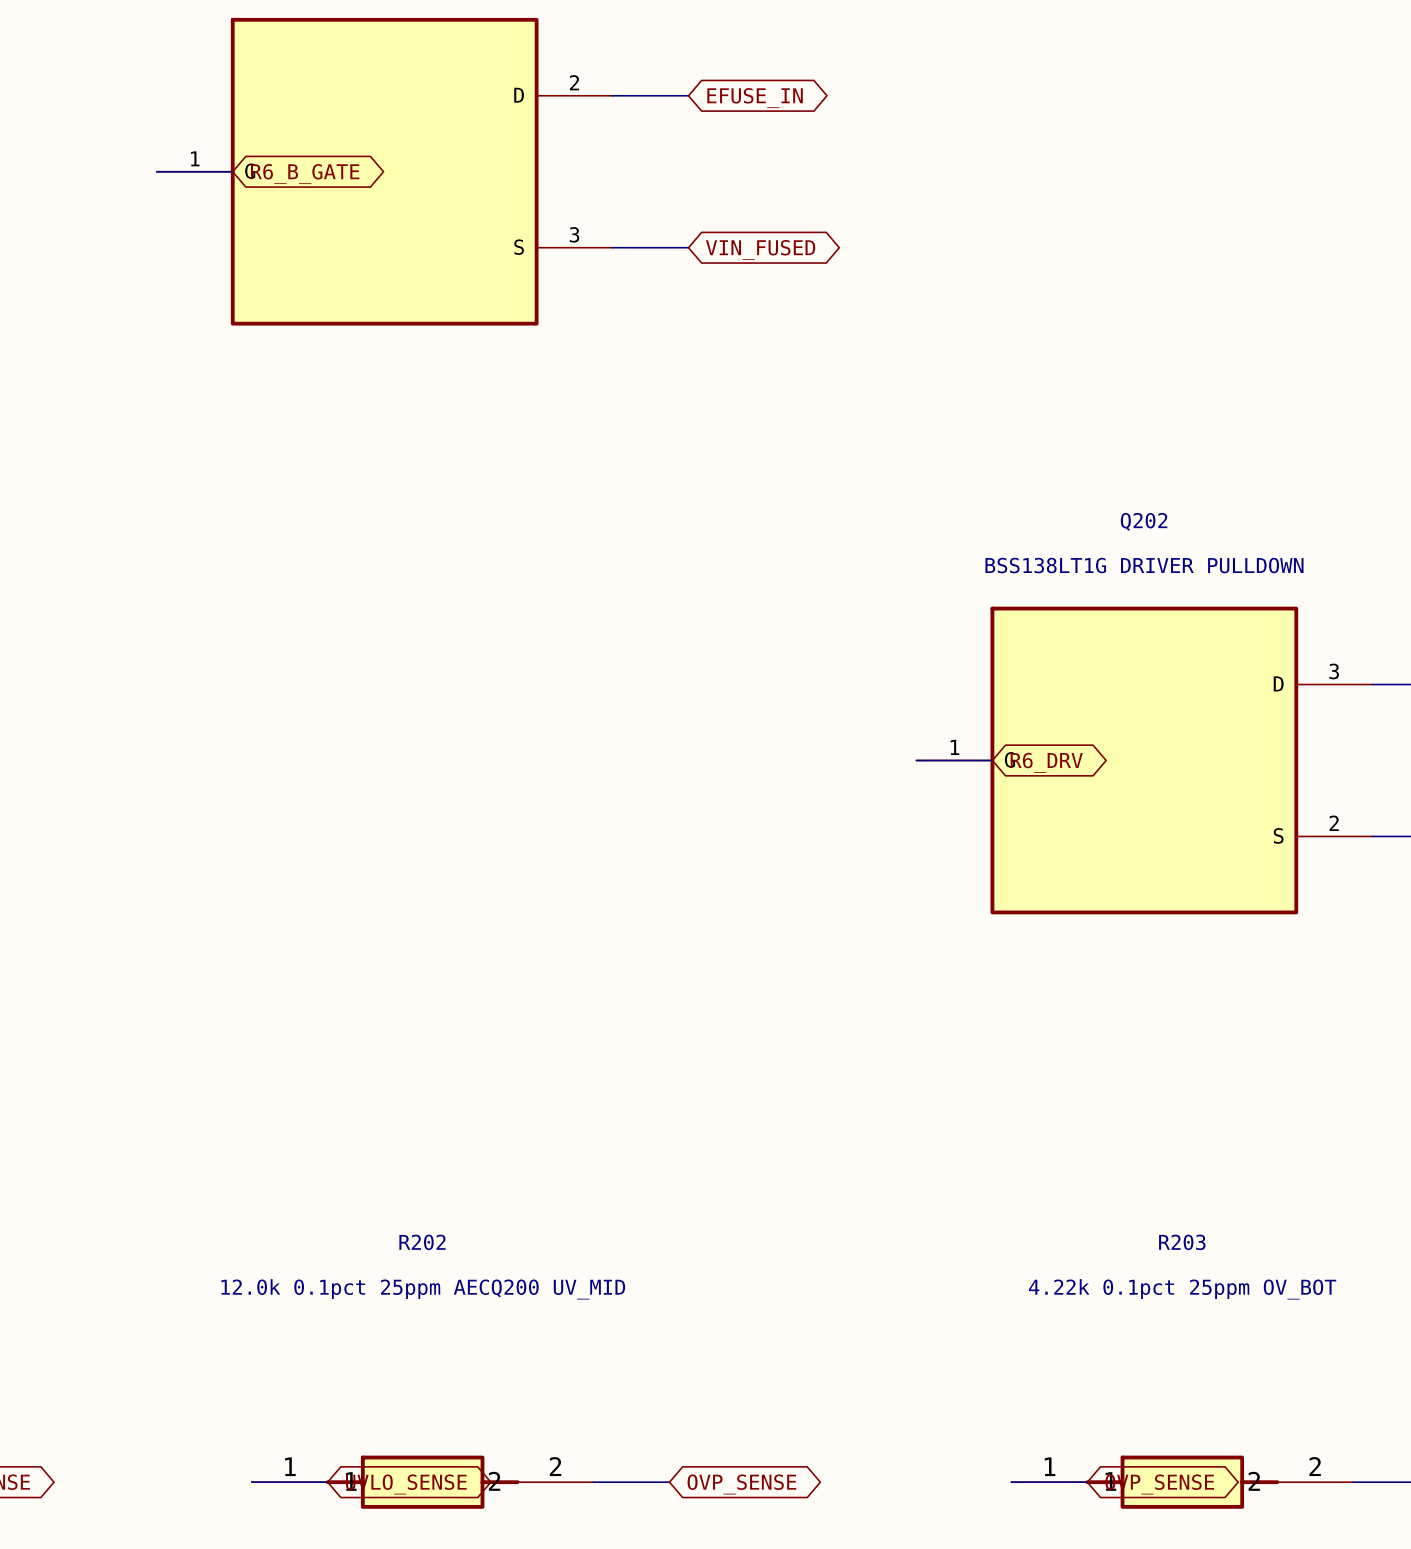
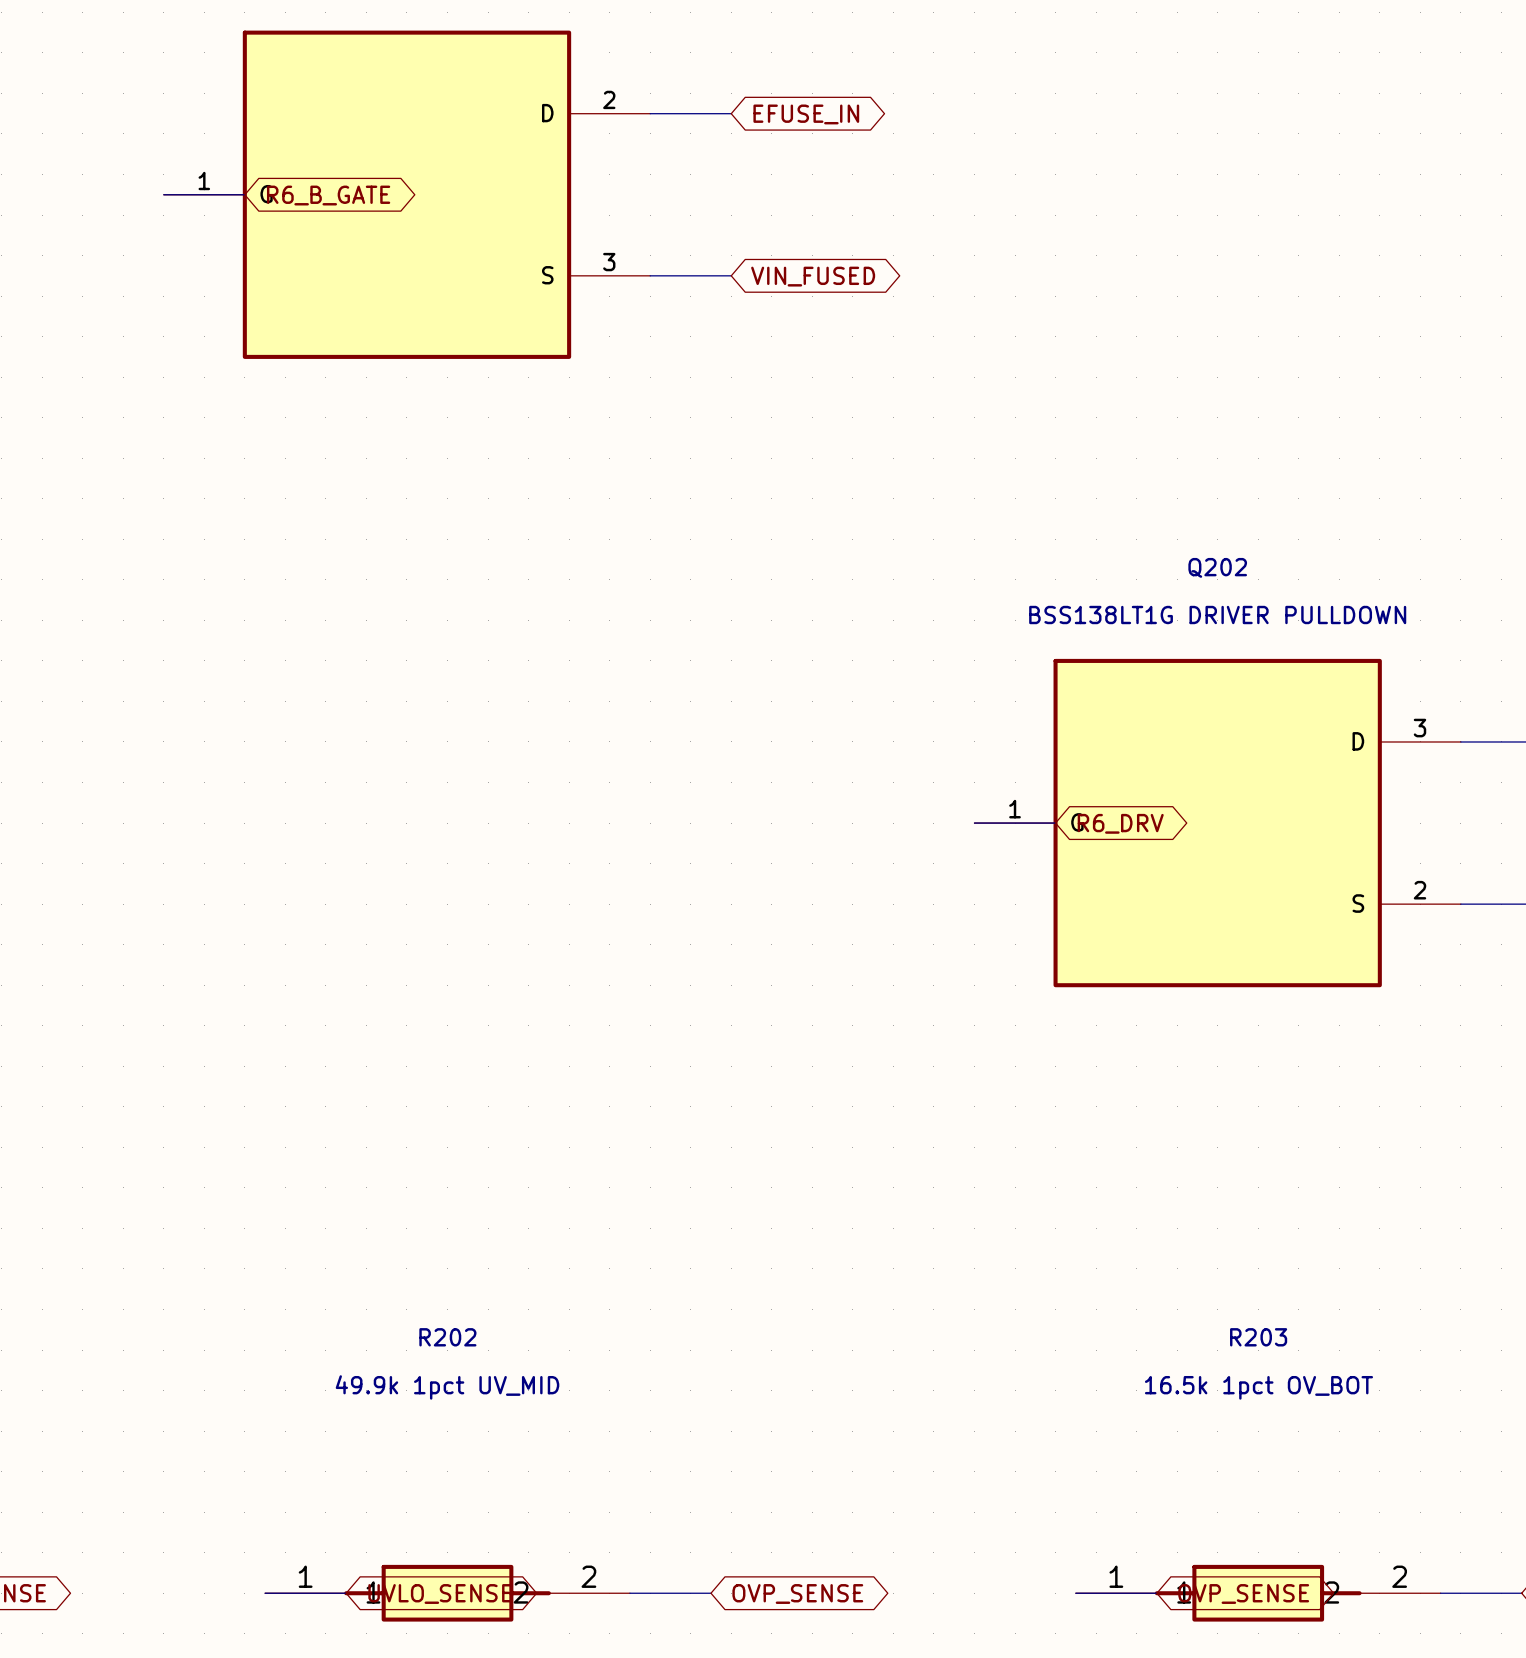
R202 value: 12.0k 0.1pct 25ppm AECQ200 UV_MID (423, 1289) -> 49.9k 1pct UV_MID (447, 1387)
R203 value: 4.22k 0.1pct 25ppm OV_BOT (1182, 1289) -> 16.5k 1pct OV_BOT (1258, 1387)

